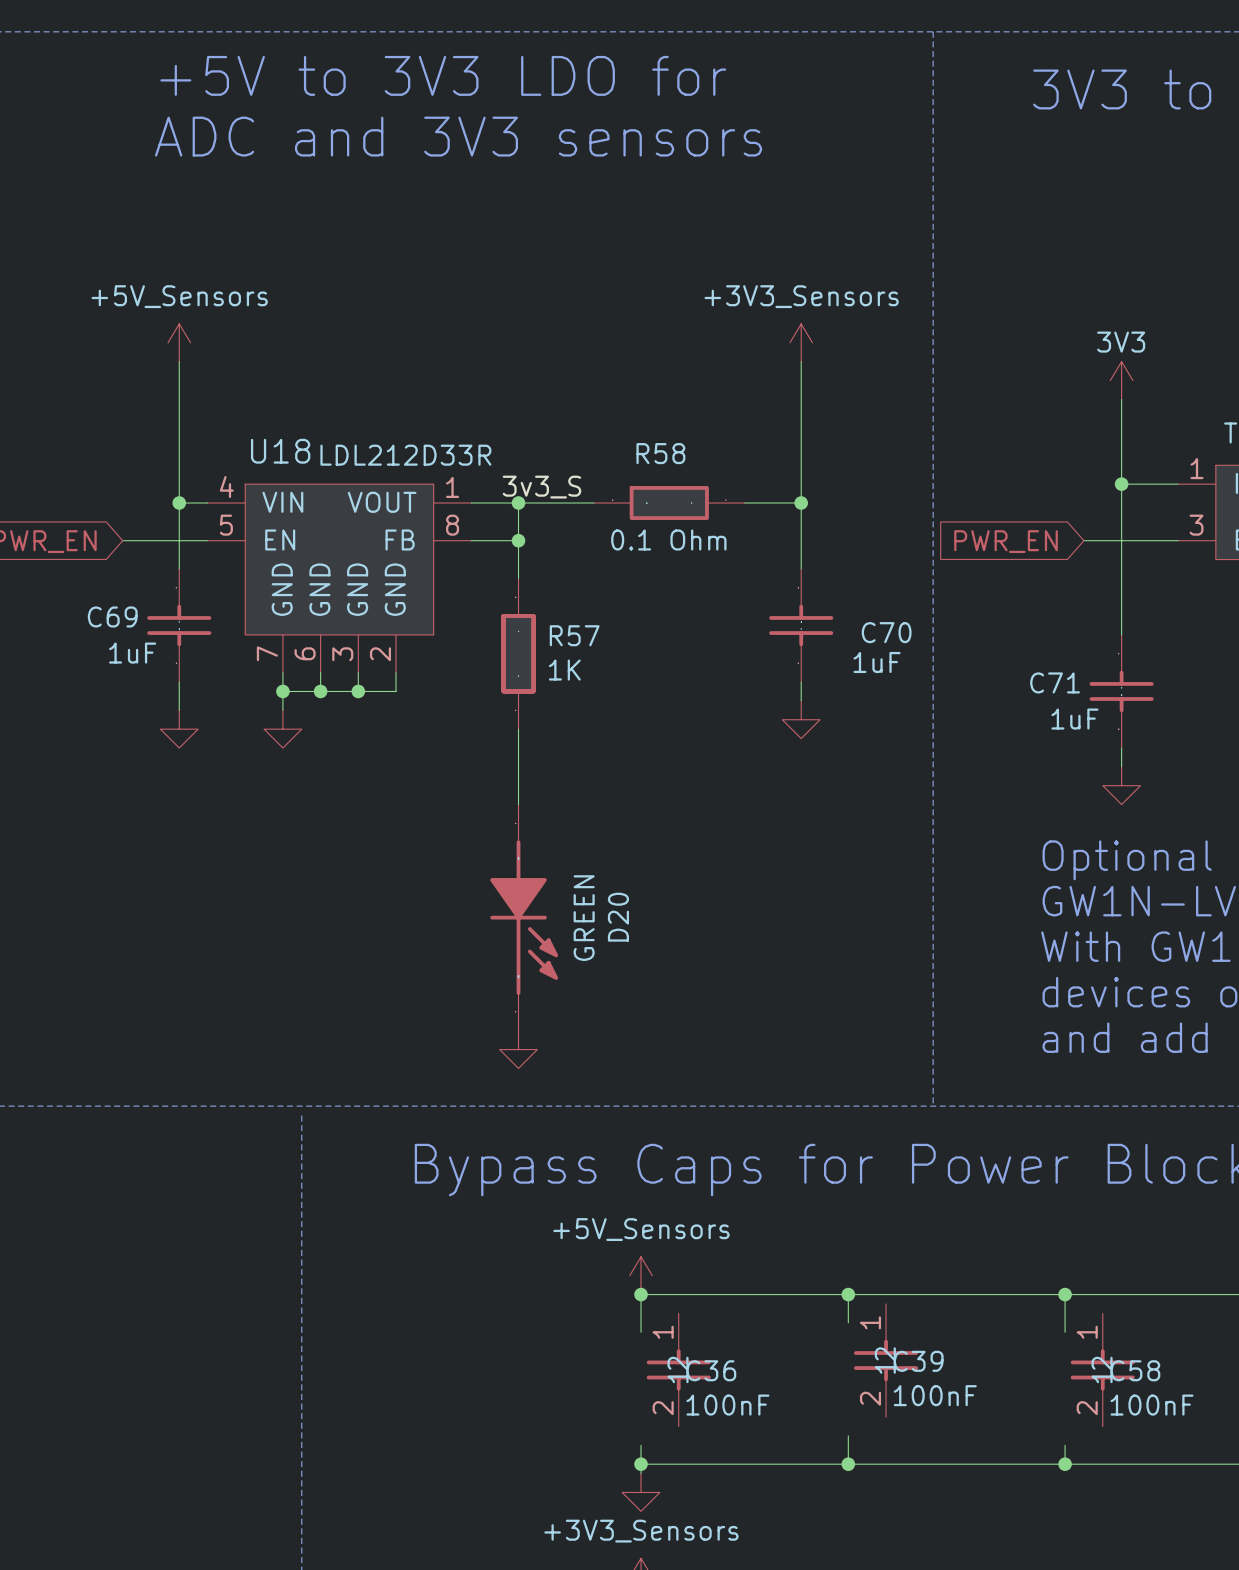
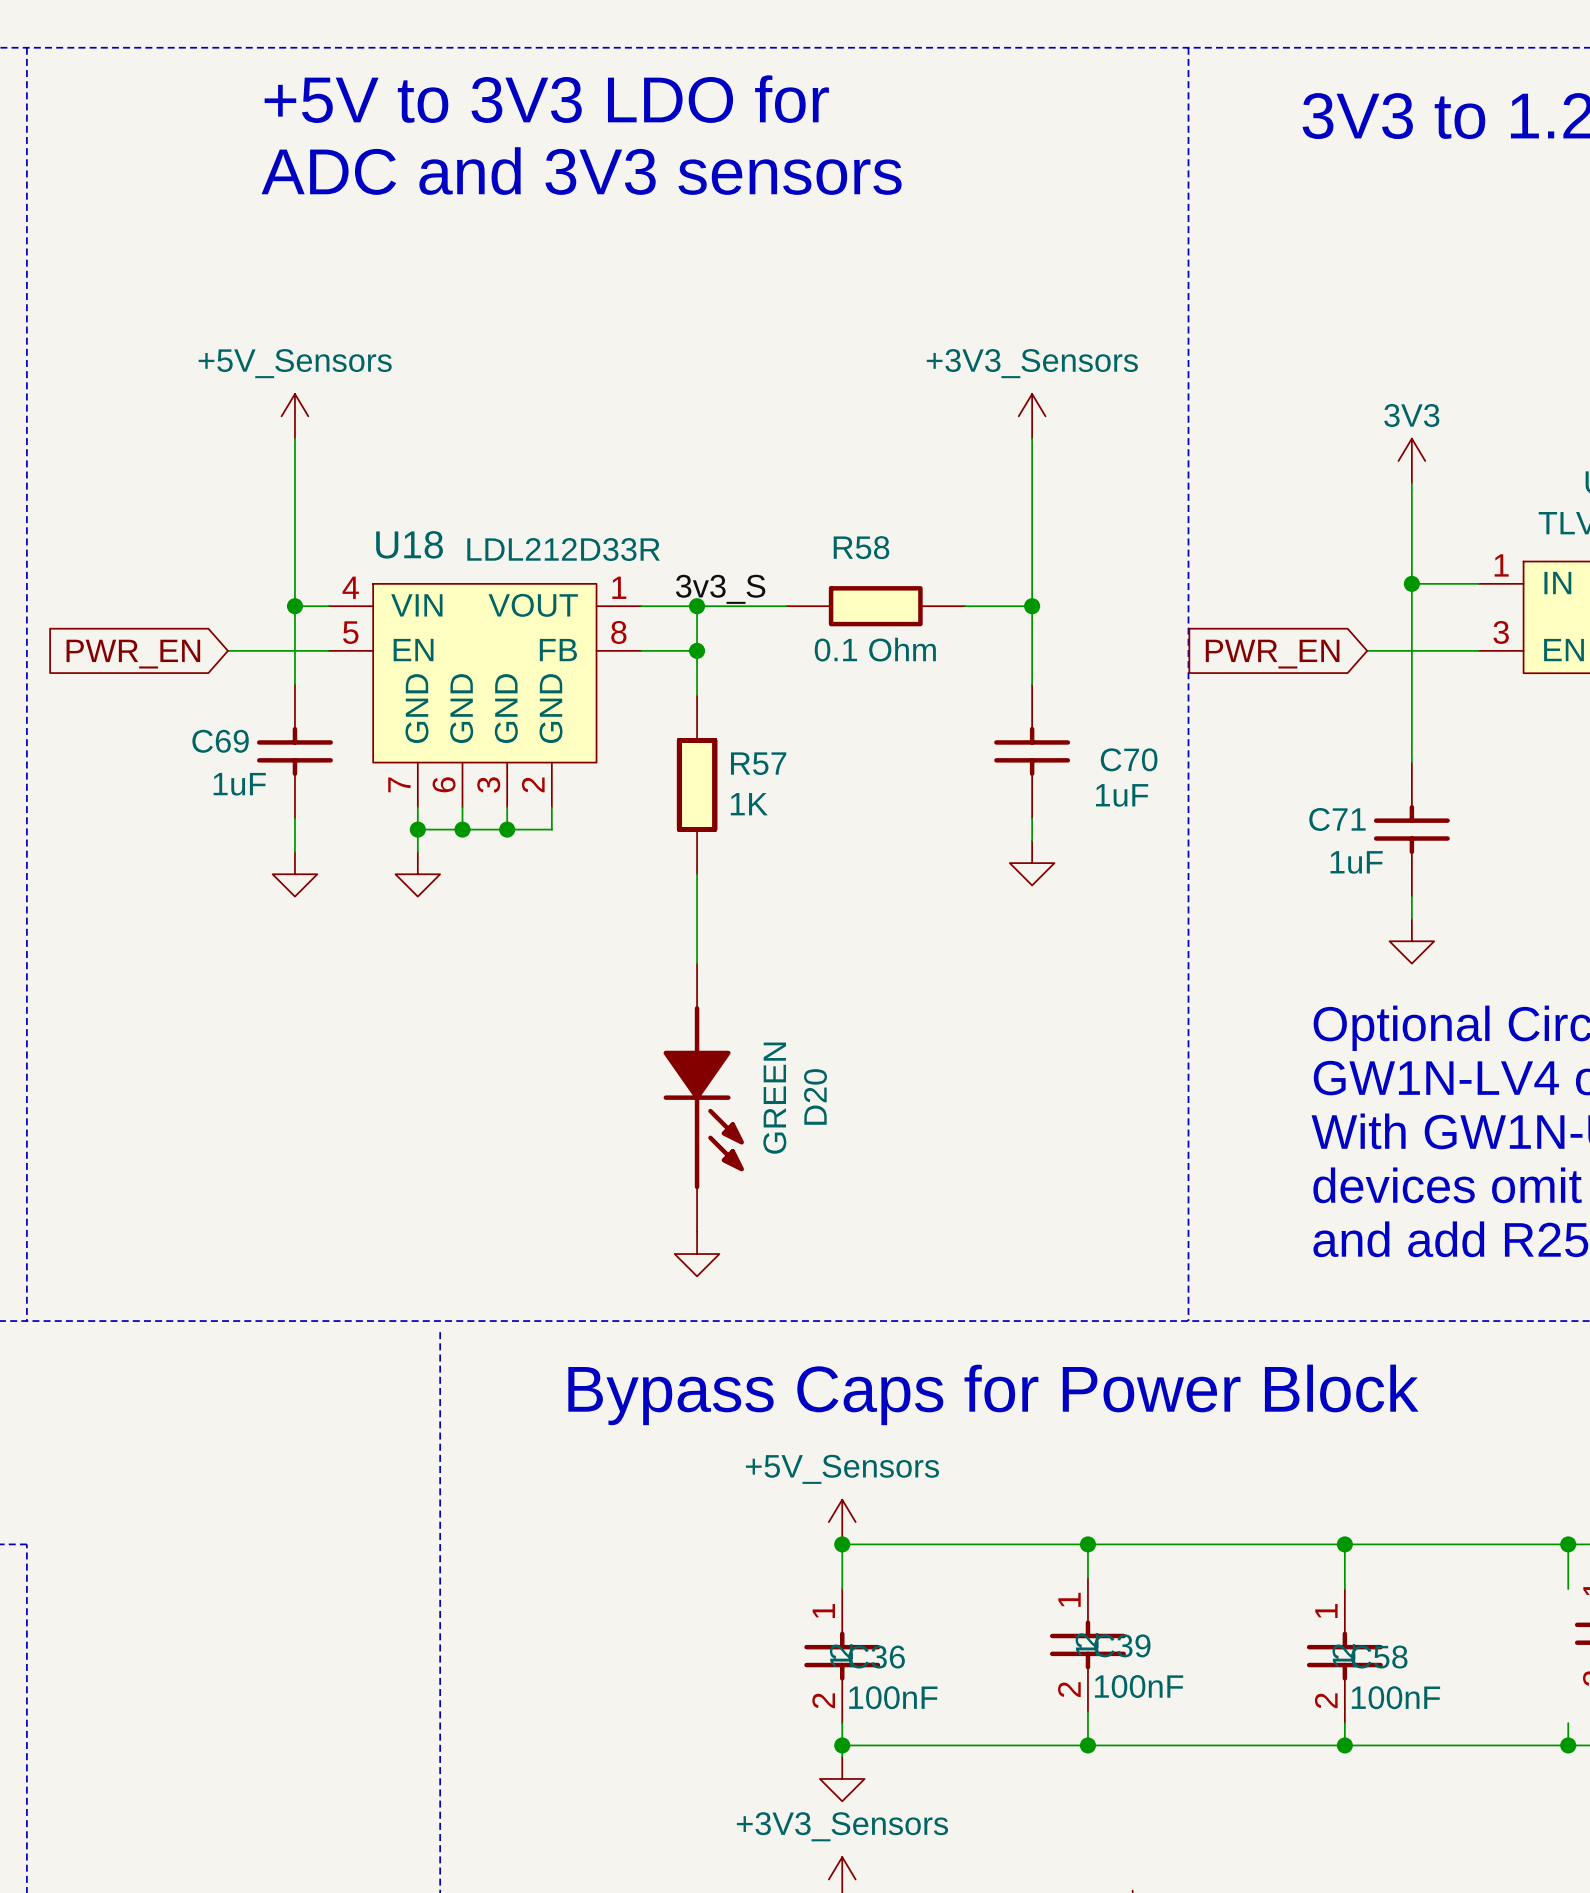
C39 position: (886, 1360) -> (1087, 1644)
C36 position: (678, 1369) -> (842, 1656)
C58 position: (1102, 1369) -> (1344, 1656)

